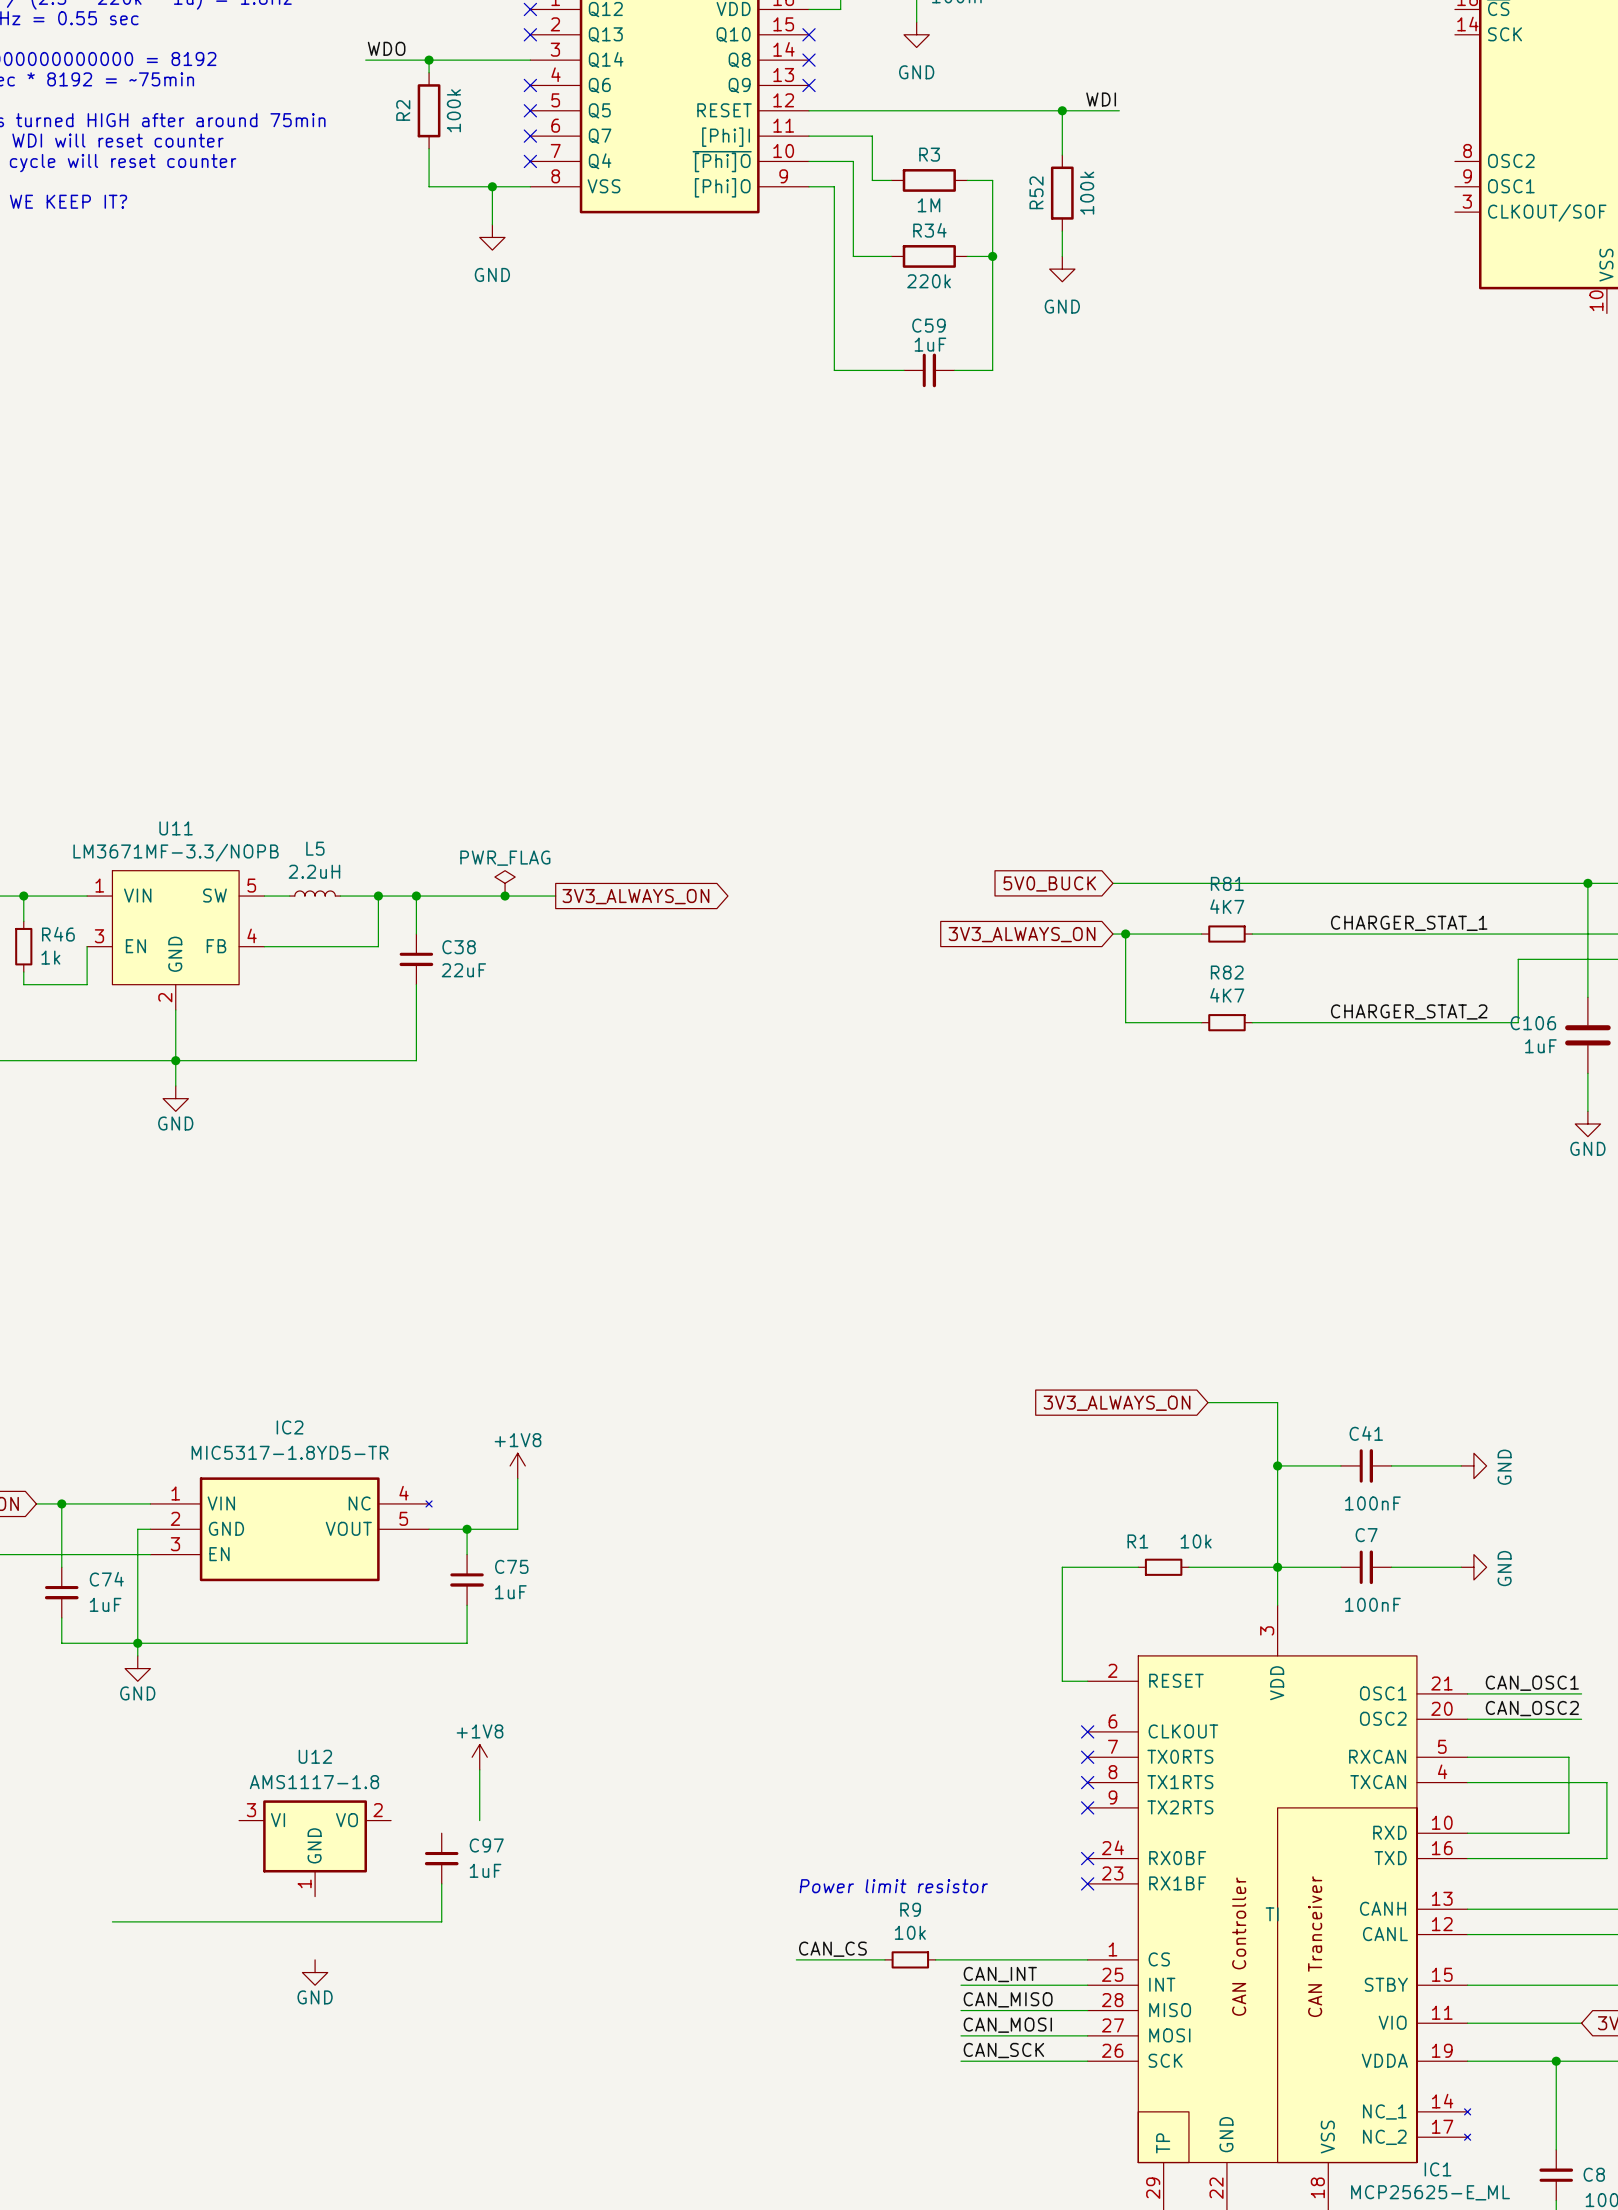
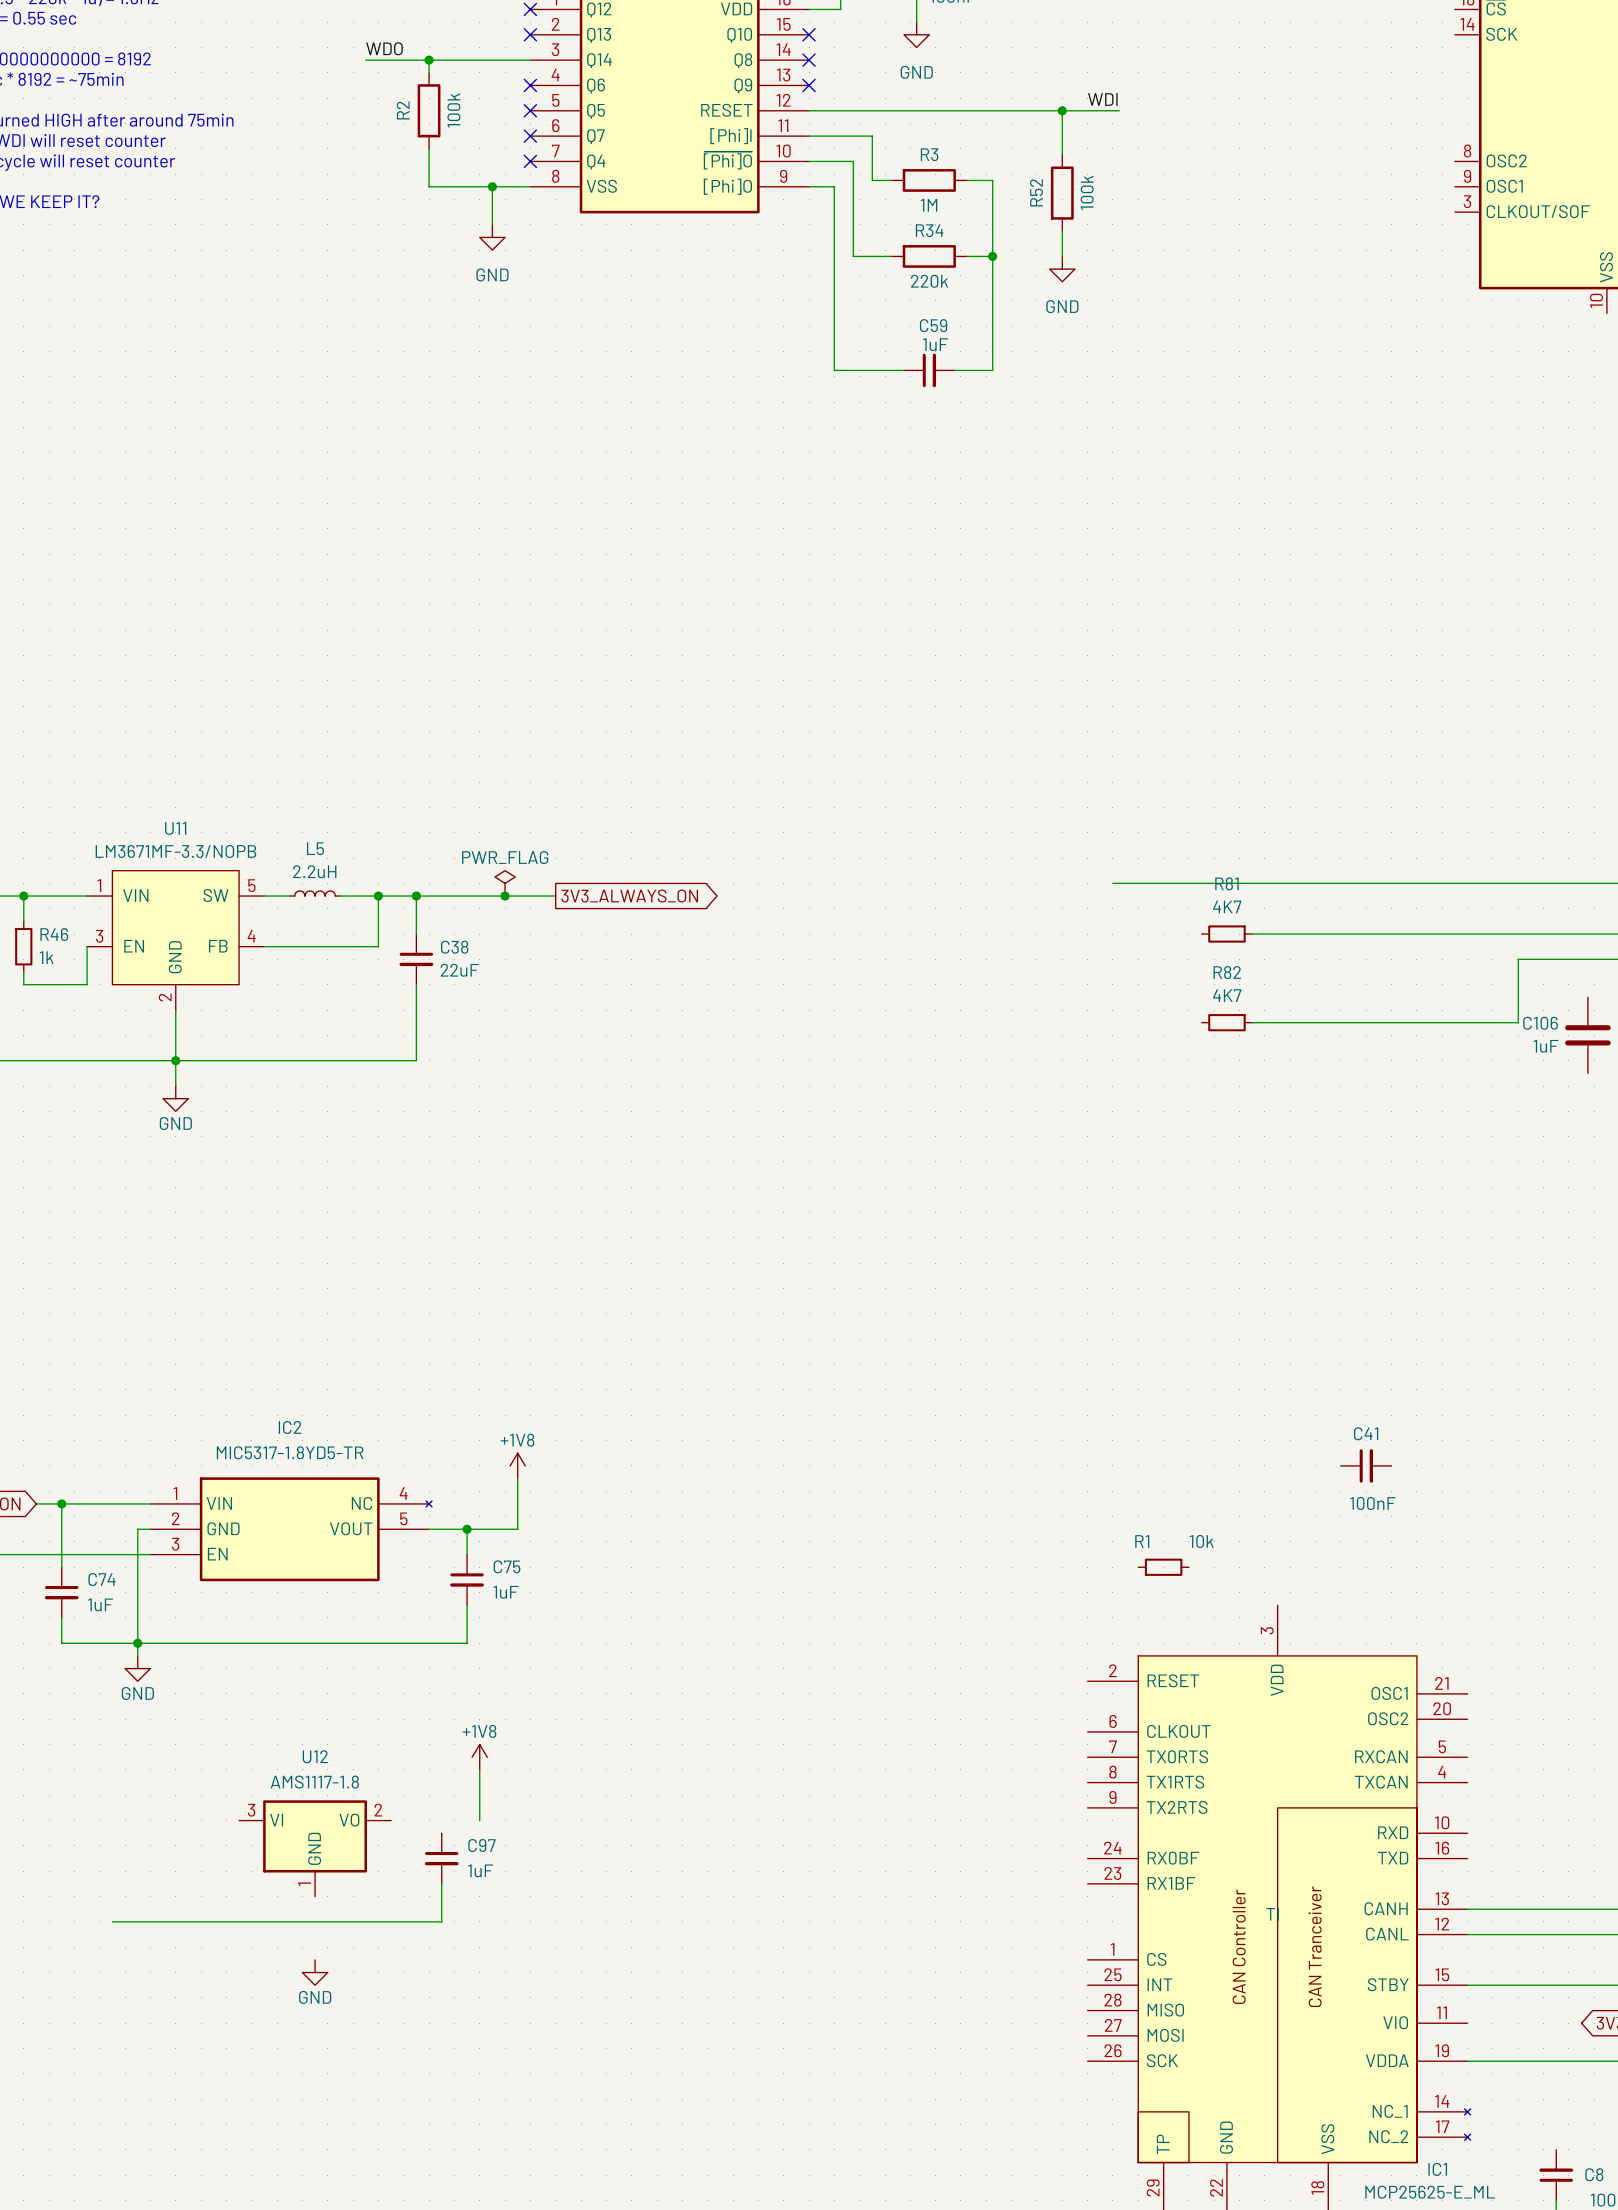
global label: 5V0_BUCK (1049, 883) -> none
wire: (1587, 883) (1587, 997) -> none
junction: (1587, 883) -> none
label: CHARGER_STAT_1 (1409, 923) -> none
global label: 3V3_ALWAYS_ON (1022, 934) -> none
wire: (1112, 934) (1201, 934) -> none
wire: (1125, 934) (1125, 1022) (1201, 1022) -> none
junction: (1125, 934) -> none
label: CHARGER_STAT_2 (1409, 1011) -> none
wire: (1587, 1073) (1587, 1111) -> none
power symbol: GND (1587, 1123) -> none
wire: (1207, 1402) (1277, 1402) (1277, 1605) -> none
global label: 3V3_ALWAYS_ON (1117, 1403) -> none
wire: (1277, 1465) (1340, 1465) -> none
junction: (1277, 1465) -> none
wire: (1391, 1465) (1461, 1465) -> none
power symbol: GND (1473, 1465) -> none
wire: (1138, 1567) (1062, 1567) (1062, 1681) (1087, 1681) -> none
wire: (1188, 1567) (1340, 1567) -> none
junction: (1277, 1567) -> none
C7: 100nF (1366, 1567) -> none
wire: (1391, 1567) (1461, 1567) -> none
power symbol: GND (1473, 1567) -> none
label: CAN_OSC1 (1532, 1683) -> none
wire: (1467, 1693) (1581, 1693) -> none
label: CAN_OSC2 (1532, 1708) -> none
wire: (1467, 1719) (1581, 1719) -> none
no-connect mark: (1087, 1731) -> none
no-connect mark: (1087, 1757) -> none
wire: (1467, 1757) (1568, 1757) (1568, 1833) (1467, 1833) -> none
no-connect mark: (1087, 1782) -> none
wire: (1467, 1782) (1606, 1782) (1606, 1858) (1467, 1858) -> none
no-connect mark: (1087, 1807) -> none
no-connect mark: (1087, 1858) -> none
no-connect mark: (1087, 1883) -> none
text: Power limit resistor (893, 1886) -> none
label: CAN_CS (832, 1949) -> none
wire: (796, 1959) (885, 1959) -> none
R9: 10k (910, 1959) -> none
wire: (935, 1959) (1087, 1959) -> none
label: CAN_INT (1000, 1974) -> none
wire: (960, 1985) (1087, 1985) -> none
label: CAN_MISO (1008, 1999) -> none
wire: (960, 2010) (1087, 2010) -> none
wire: (1467, 2023) (1581, 2023) -> none
label: CAN_MOSI (1007, 2025) -> none
wire: (960, 2035) (1087, 2035) -> none
label: CAN_SCK (1003, 2050) -> none
wire: (960, 2061) (1087, 2061) -> none
wire: (1556, 2061) (1556, 2149) -> none
junction: (1556, 2061) -> none

